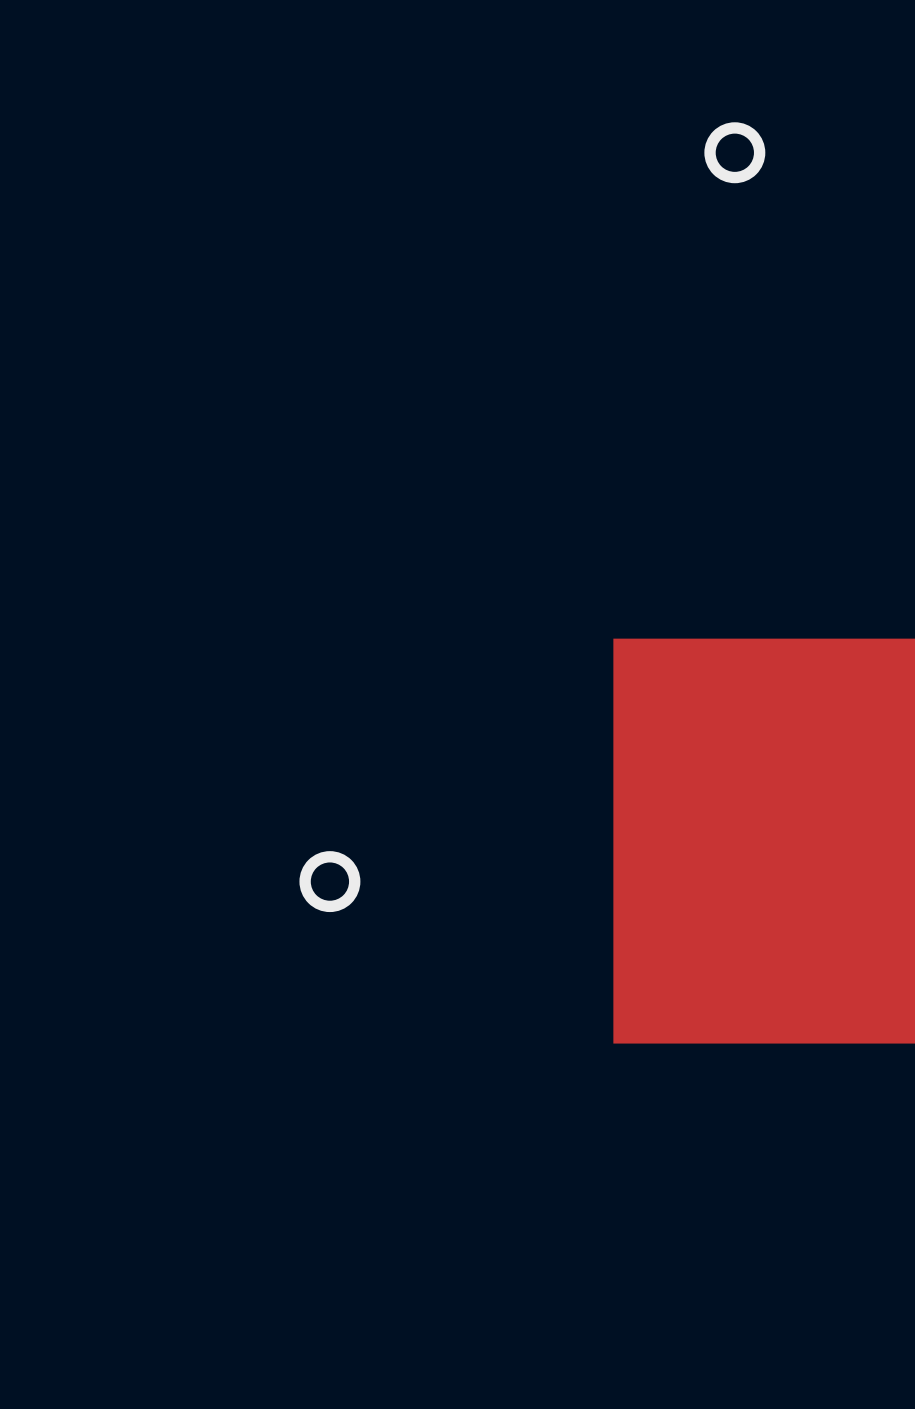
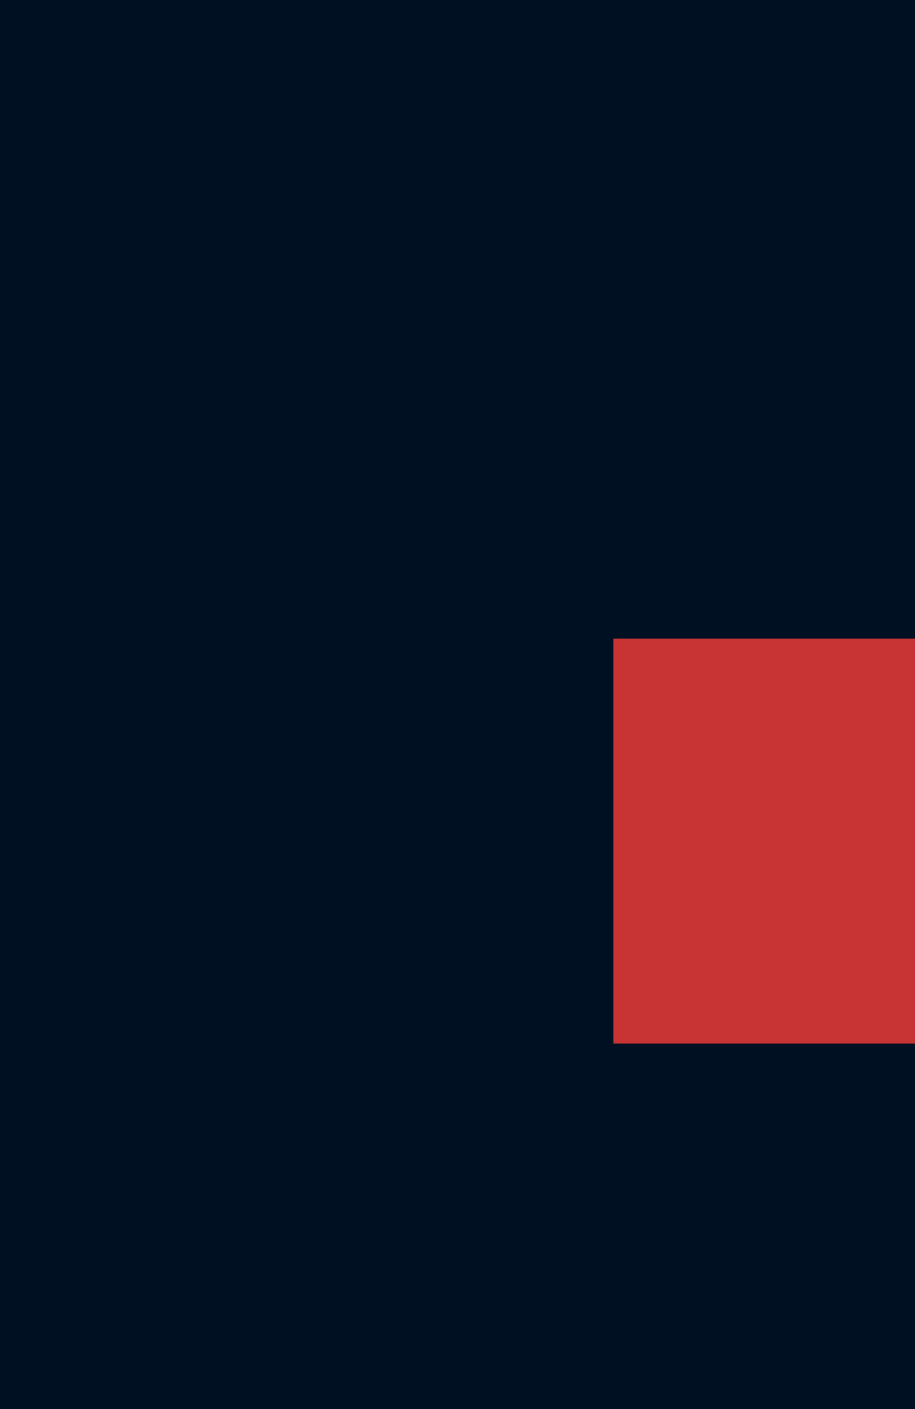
via: (734, 152) -> none
via: (329, 881) -> none

